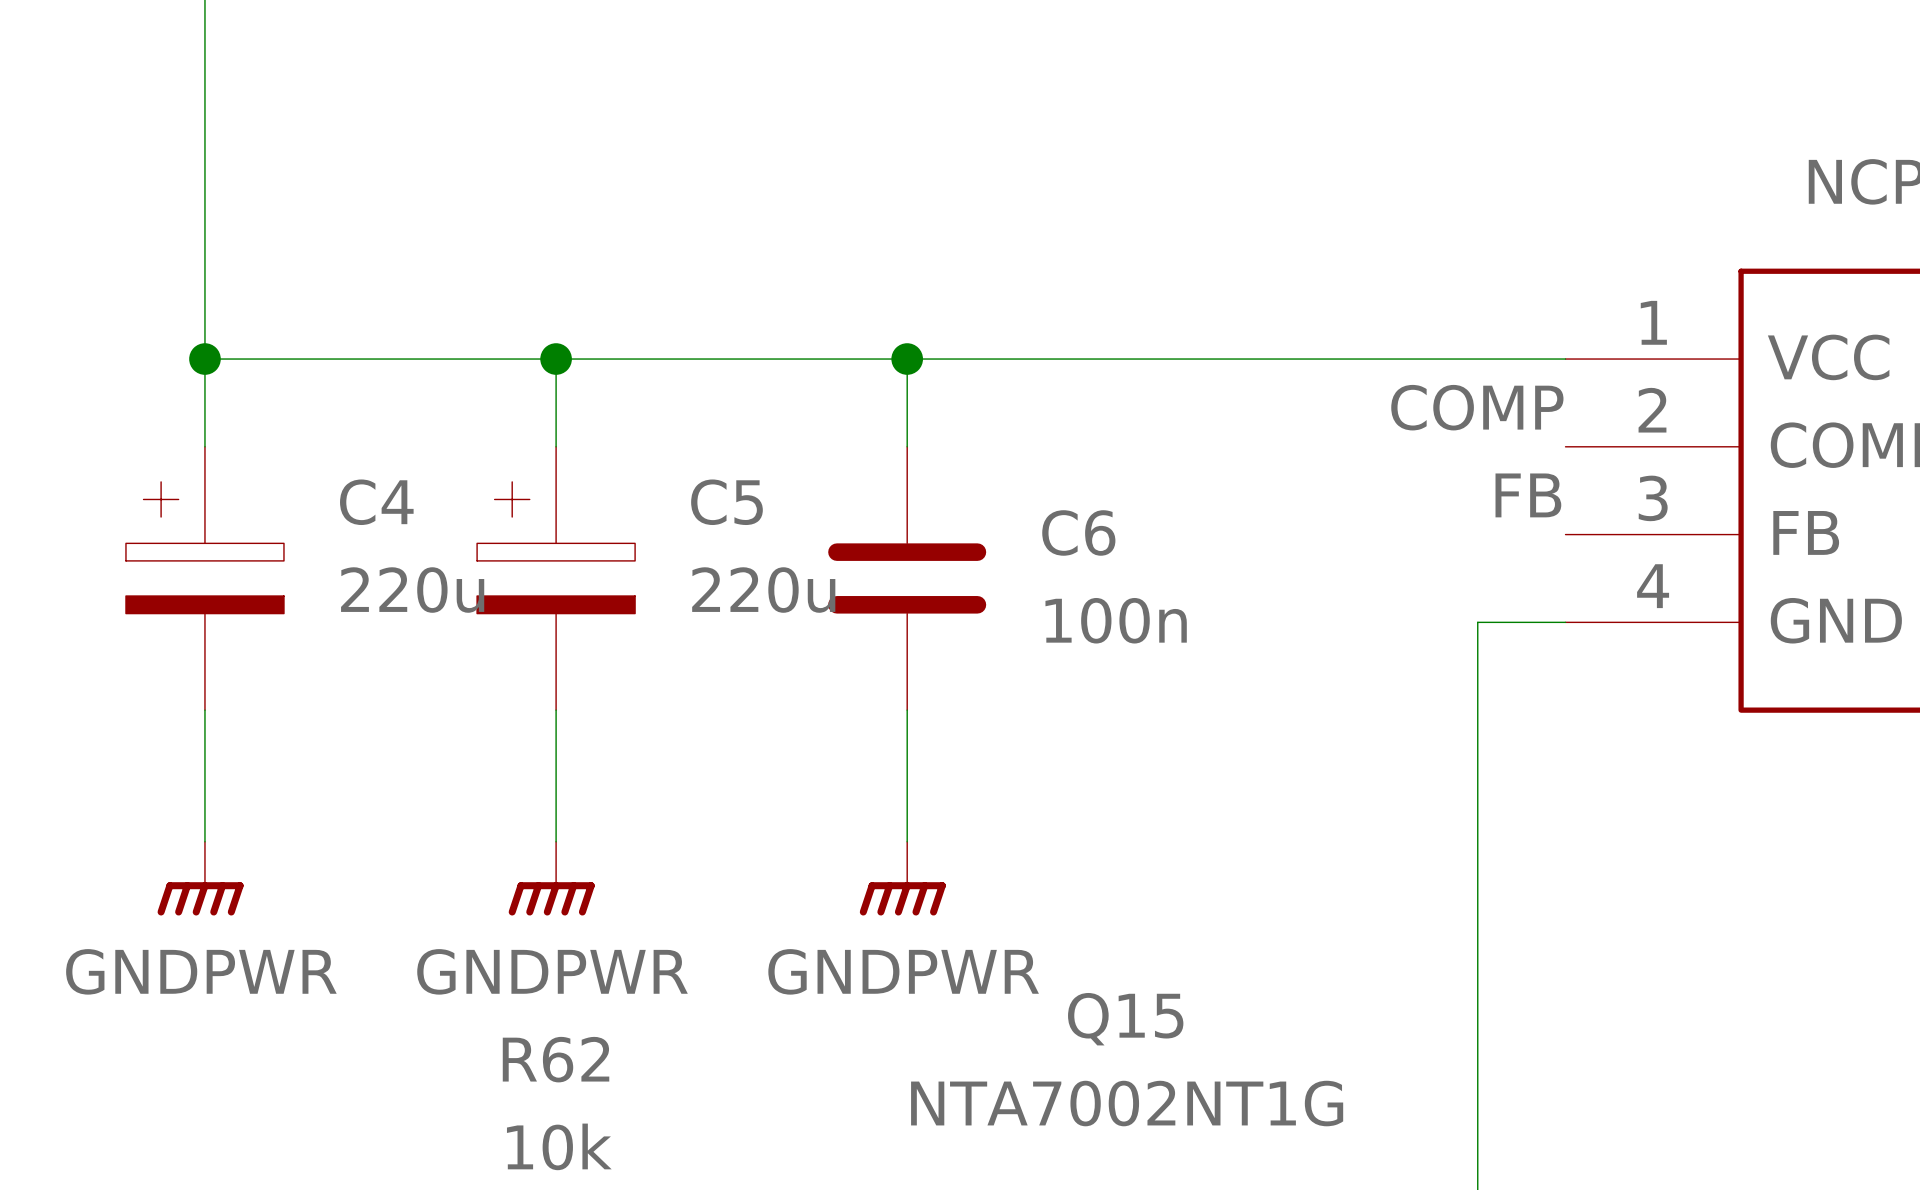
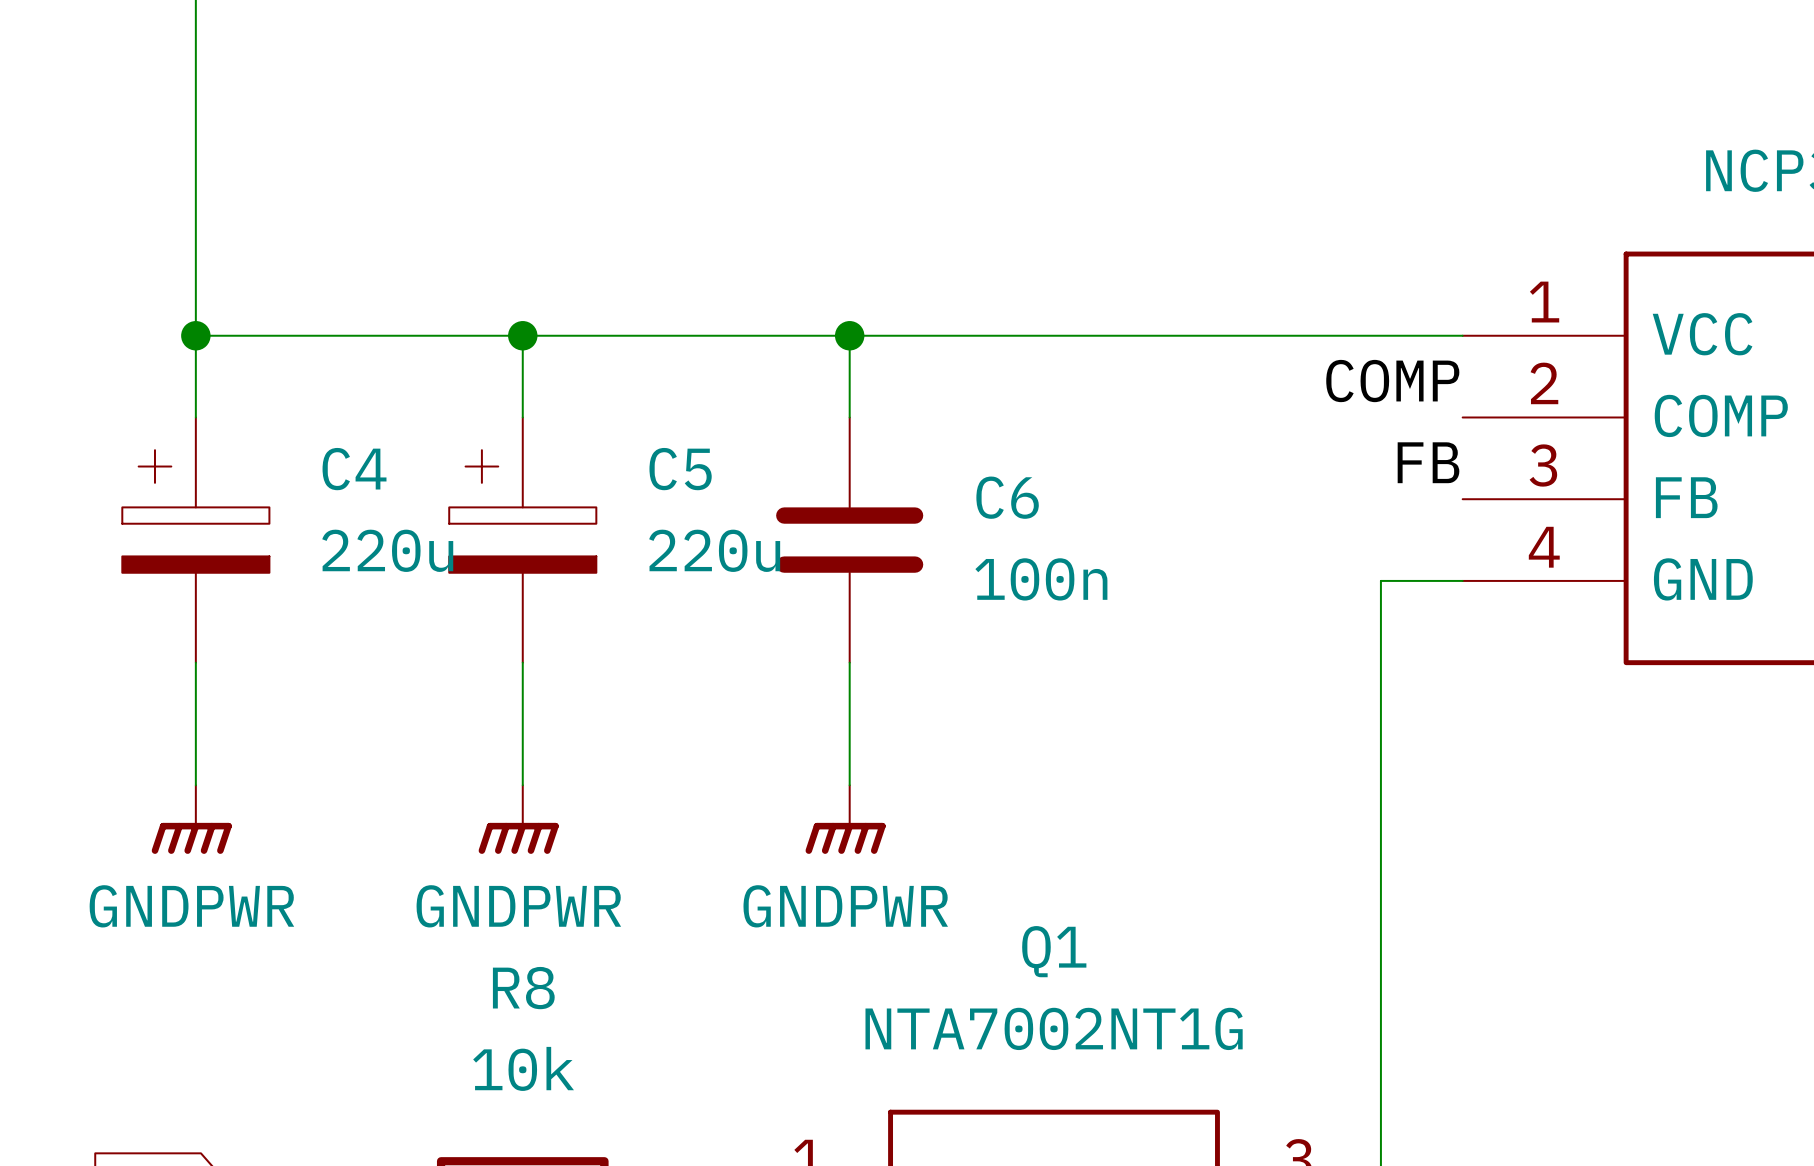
Q15 name: Q15 (1125, 1019) -> Q1 (1054, 951)
R62 name: R62 (556, 1059) -> R8 (523, 988)

